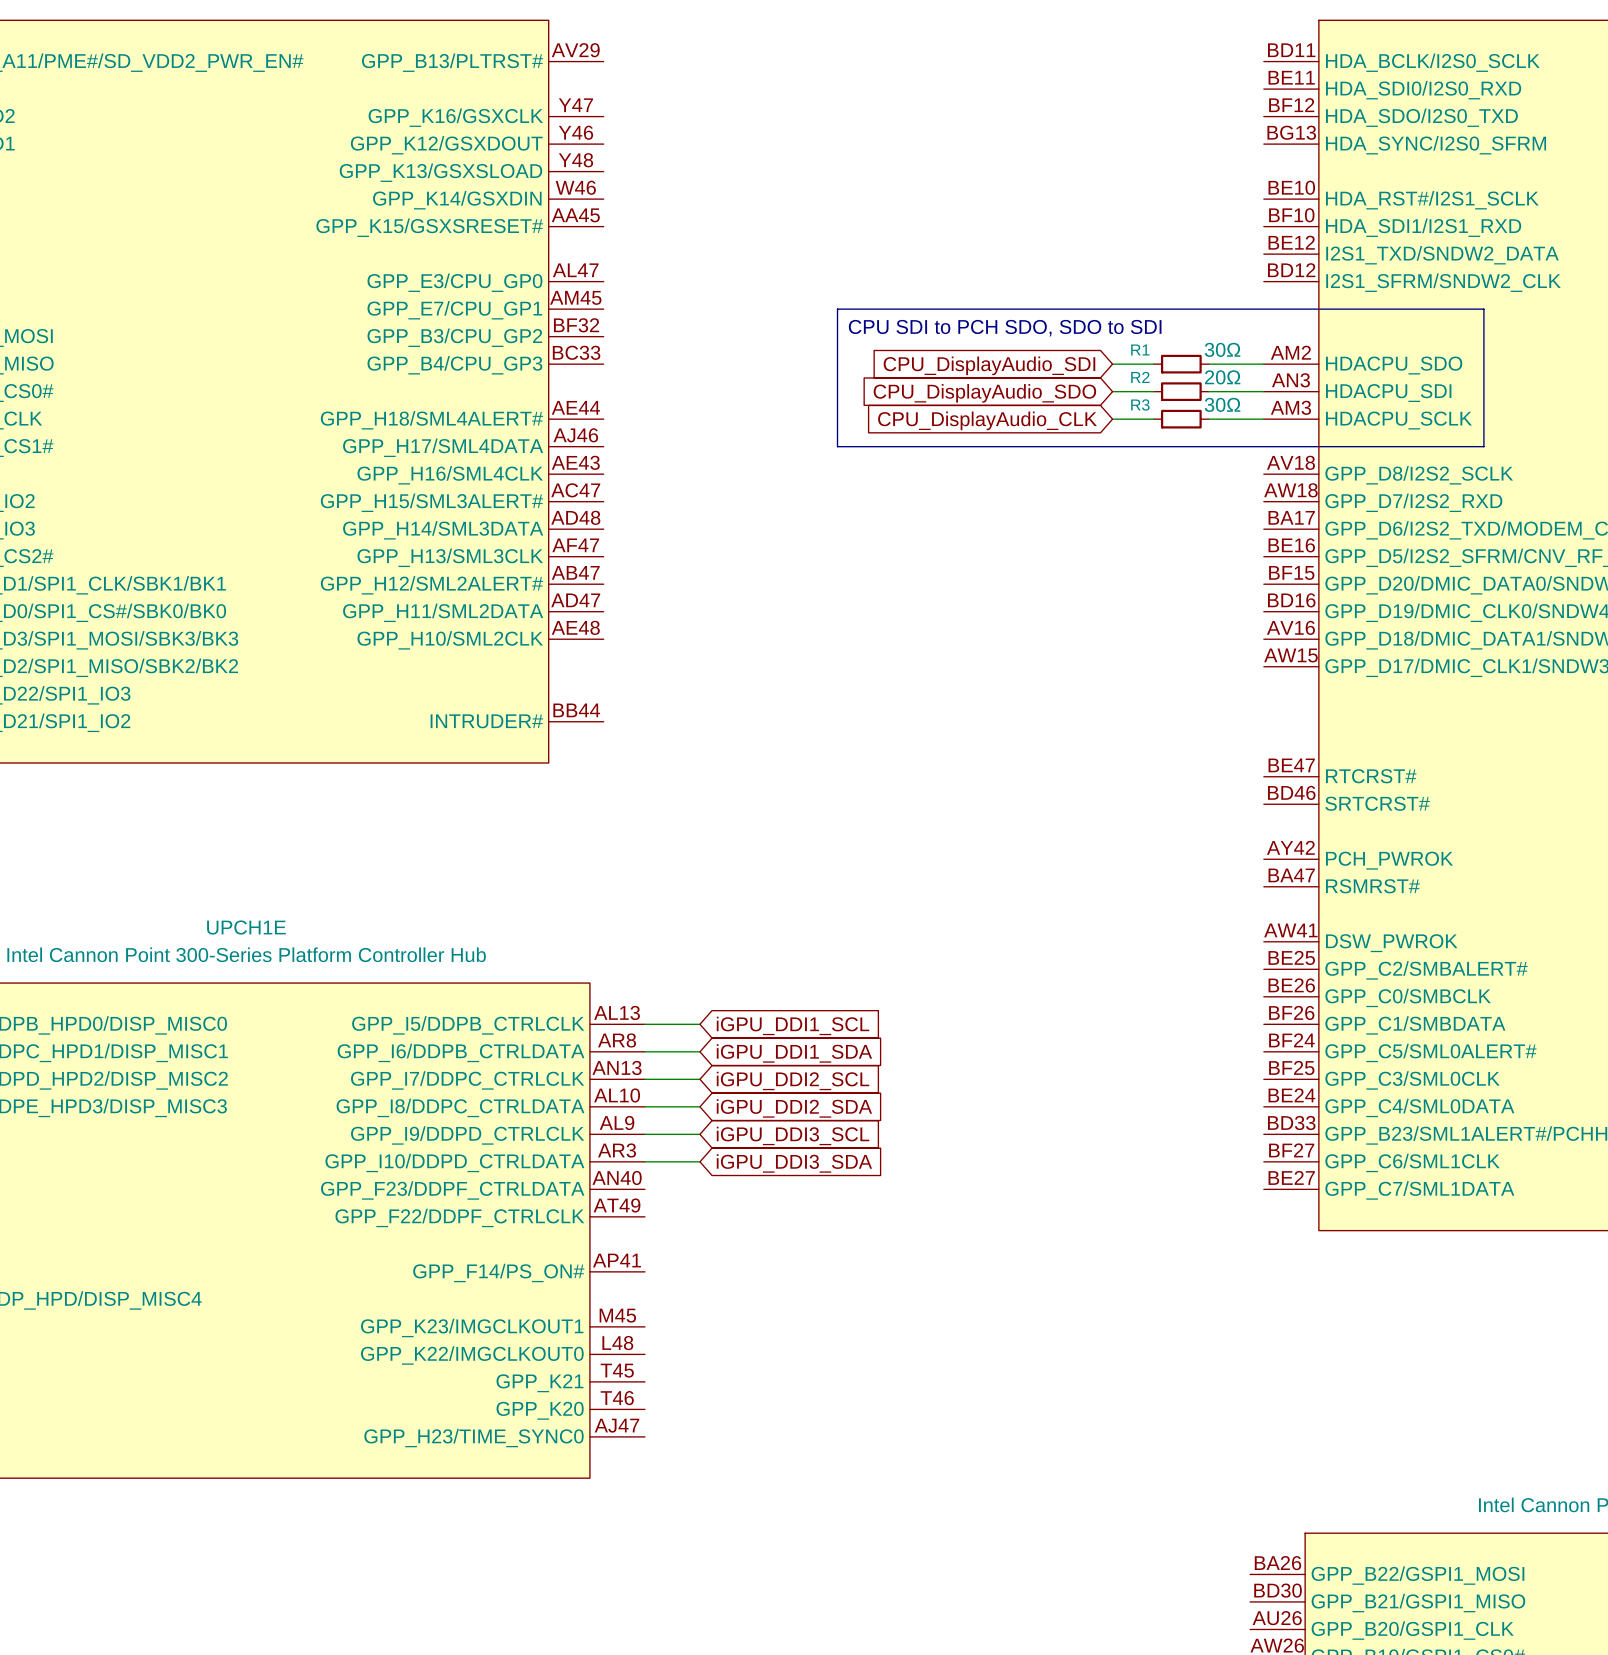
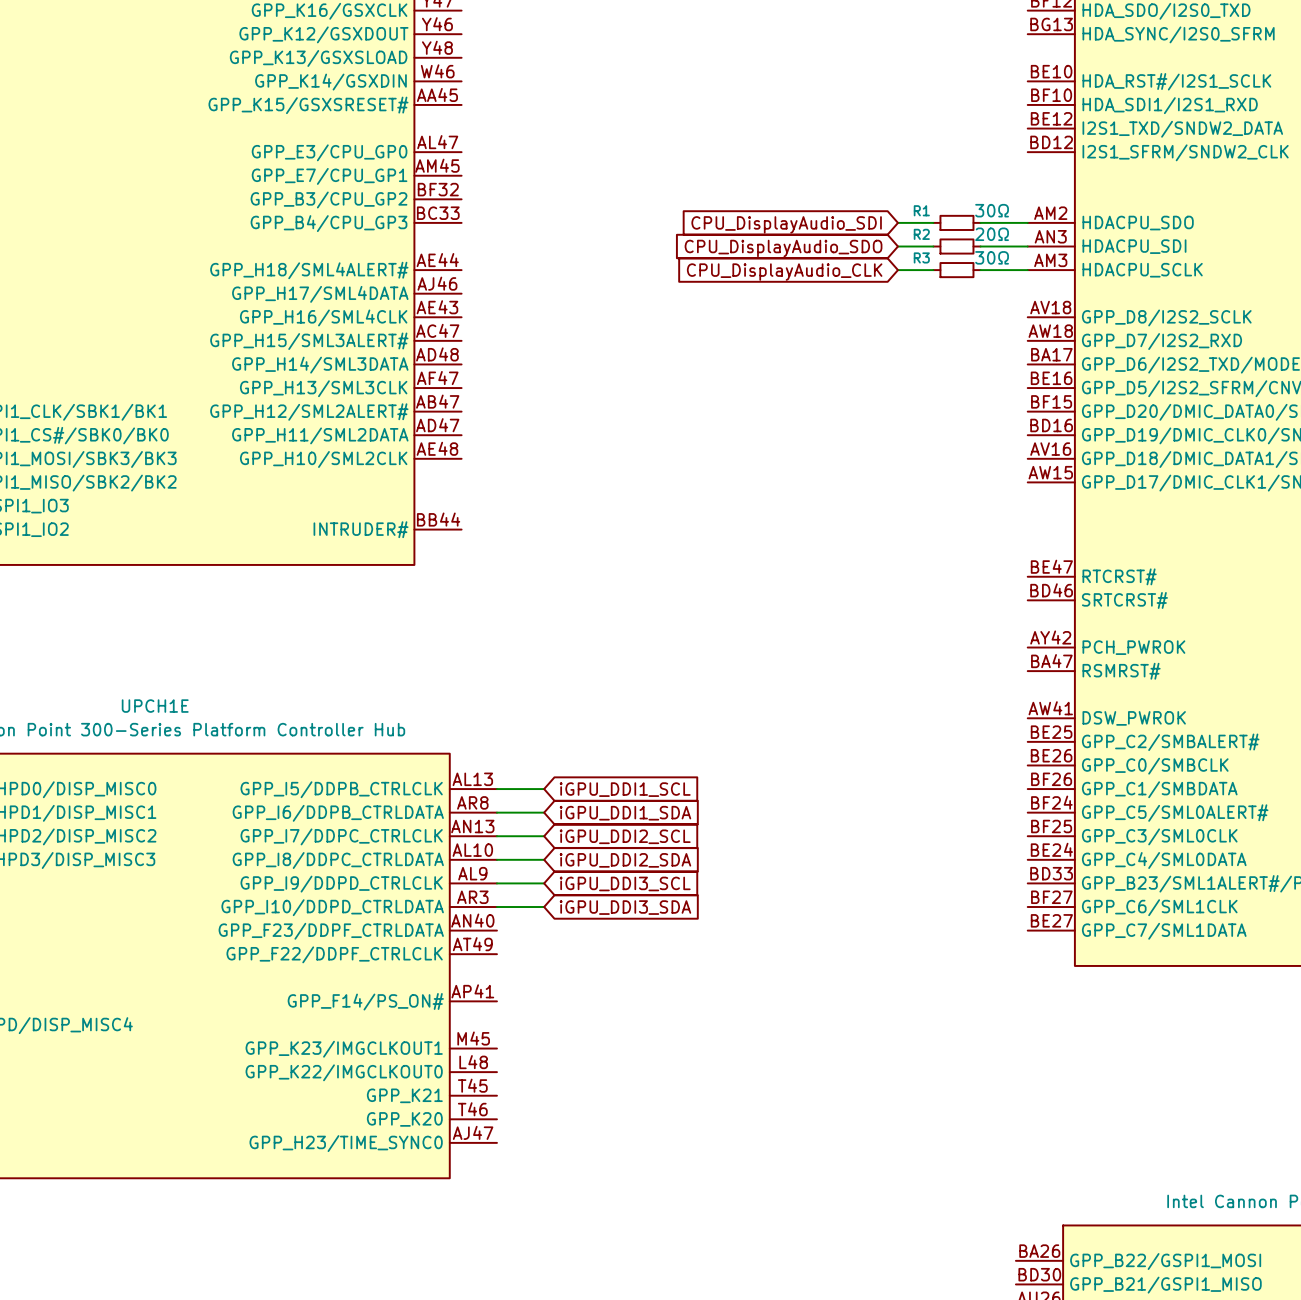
line: (837, 309) (1483, 309) (1483, 446) (837, 446) (837, 309) -> none
text: CPU SDI to PCH SDO, SDO to SDI (1005, 328) -> none

